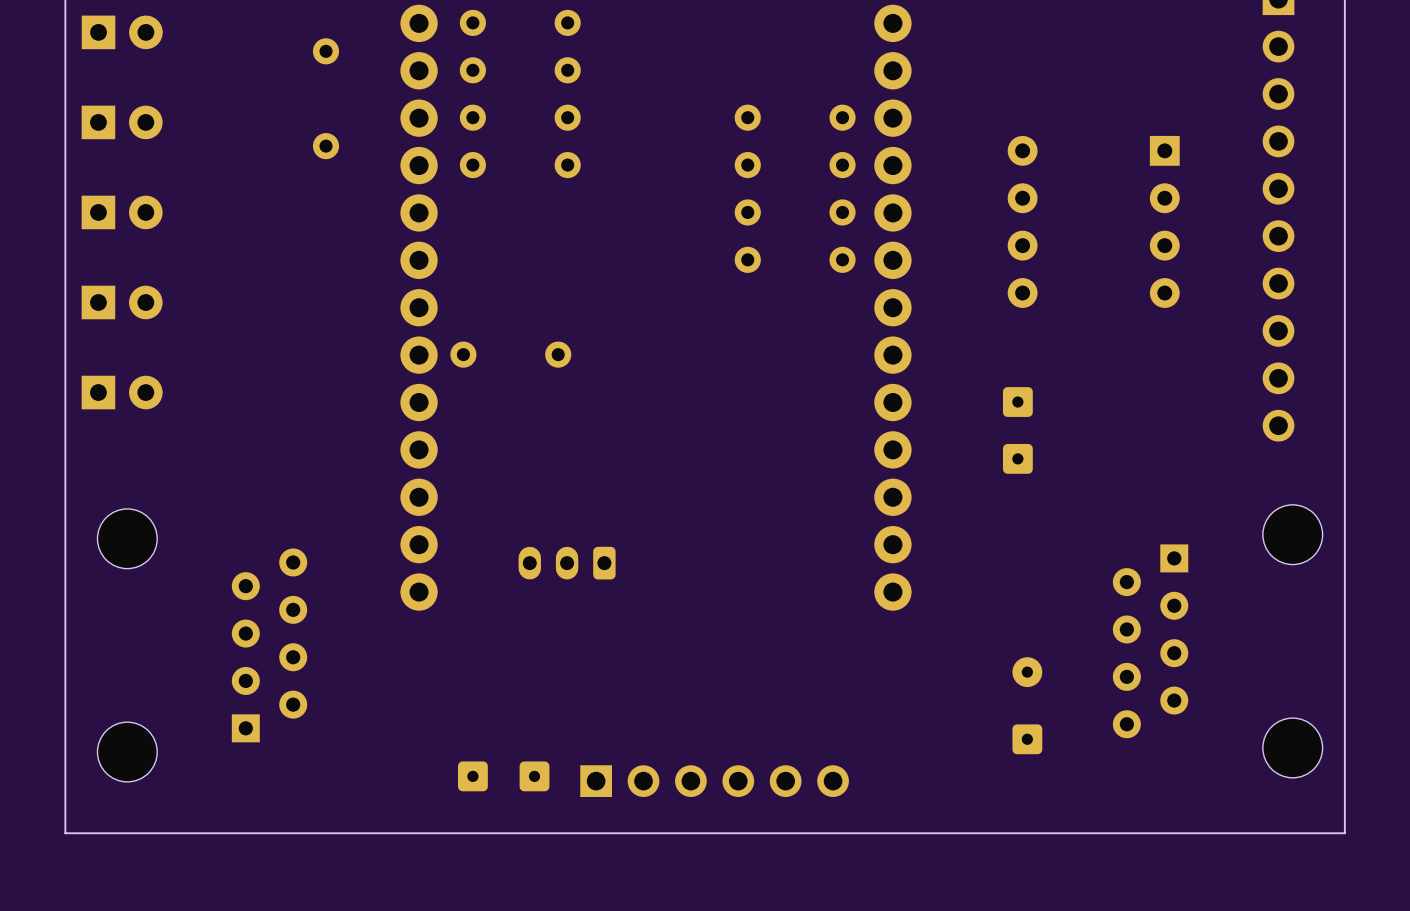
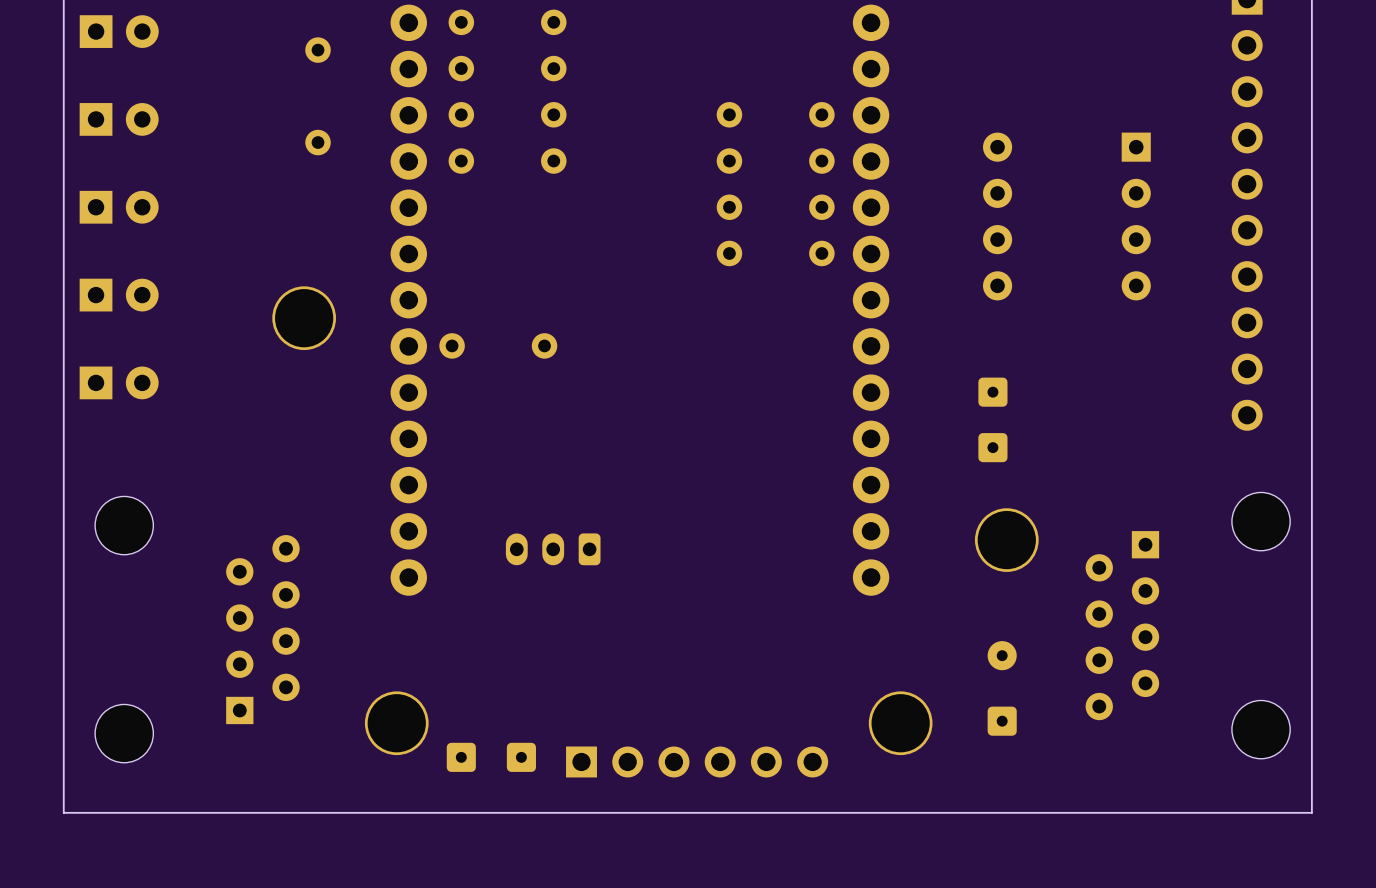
part: none -> (304, 318)
part: none -> (1006, 540)
part: none -> (396, 723)
part: none -> (900, 723)

